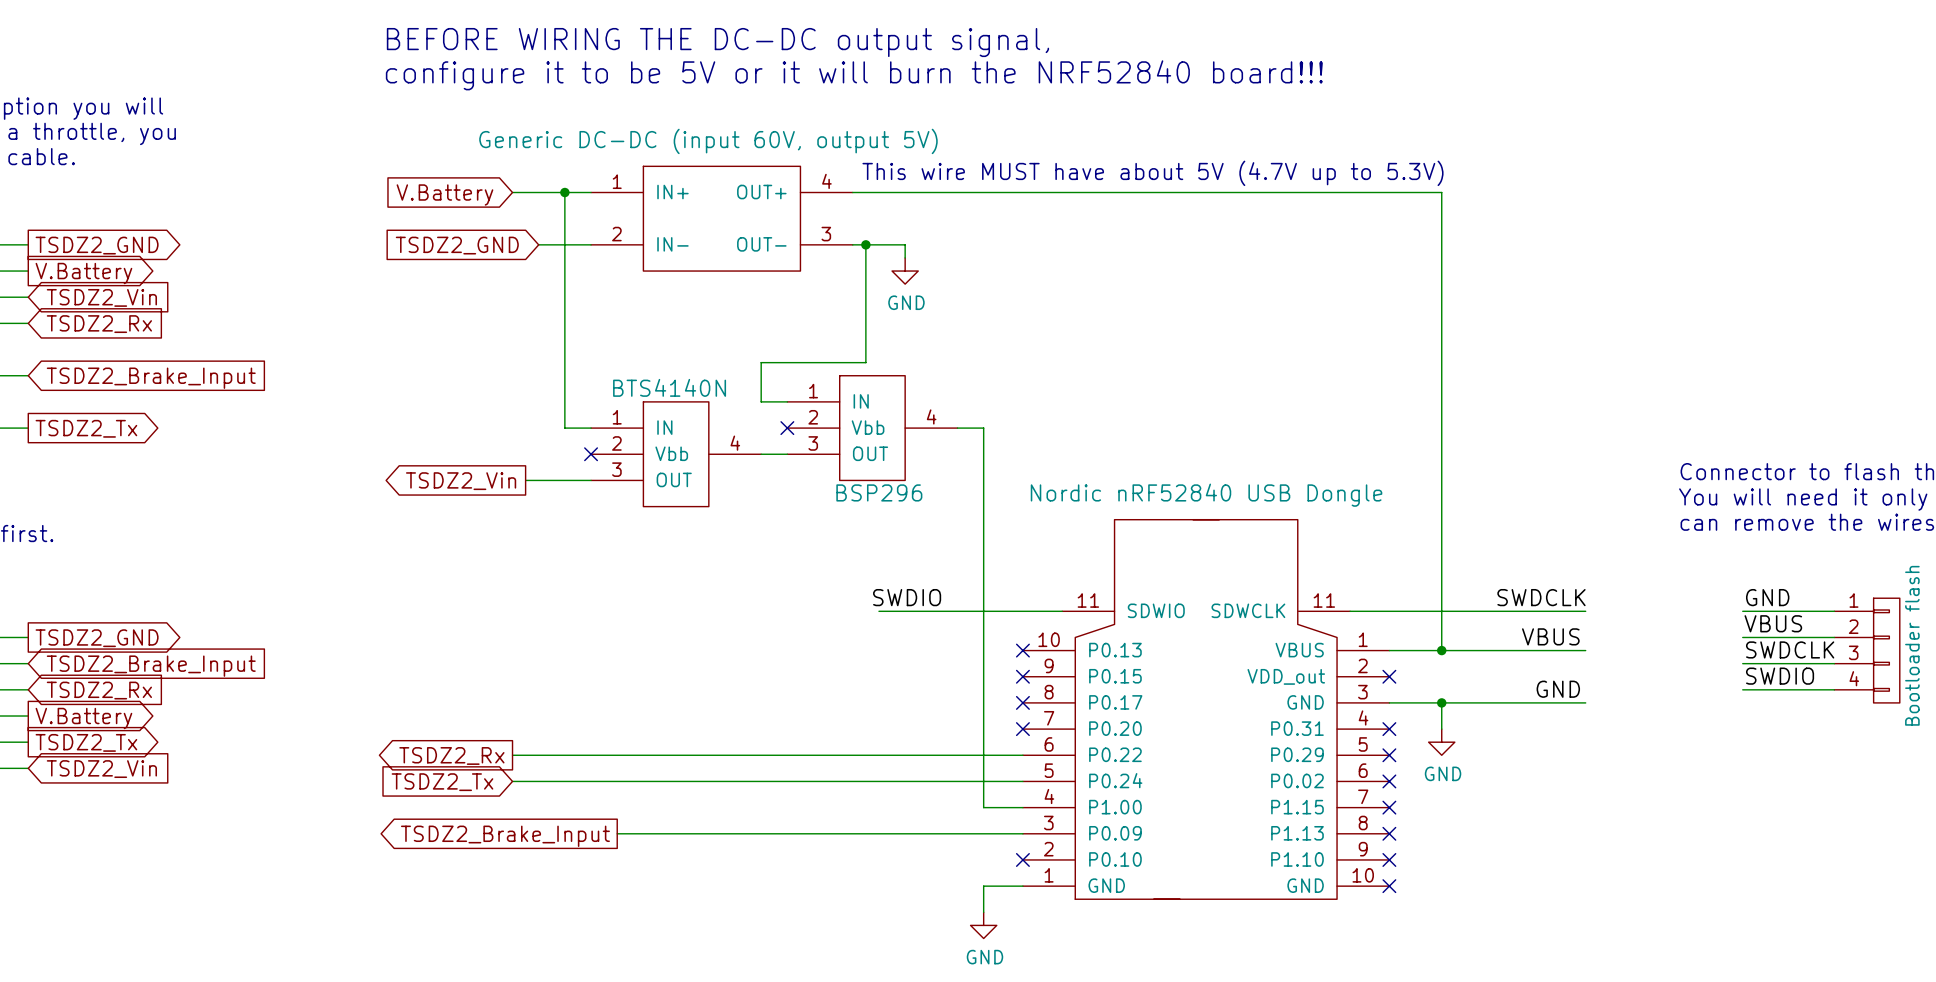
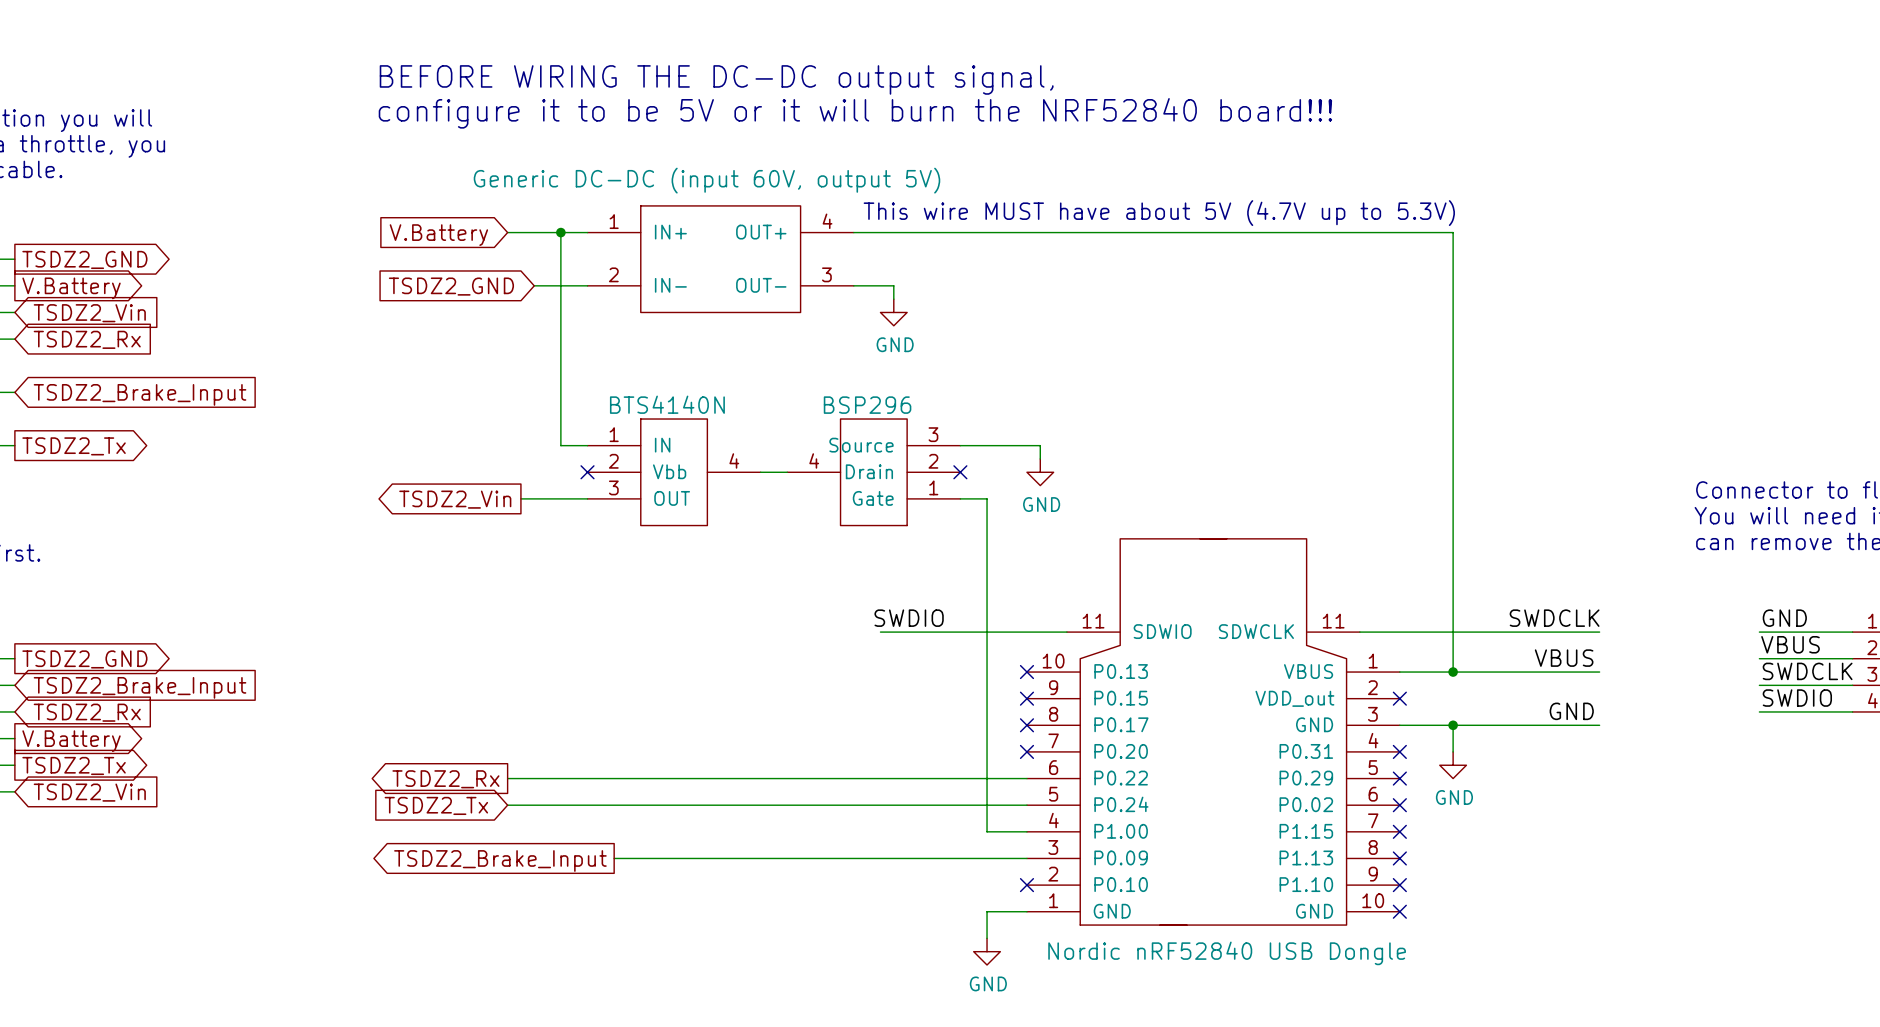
text position: BEFORE WIRING THE DC-DC output signal, (717, 42) -> BEFORE WIRING THE DC-DC output signal, (716, 79)
text position: configure it to be 5V or it will burn the NRF52840 board!!! (854, 75) -> configure it to be 5V or it will burn the NRF52840 board!!! (855, 113)
text position: This wire MUST have about 5V (4.7V up to 5.3V) (1152, 173) -> This wire MUST have about 5V (4.7V up to 5.3V) (1159, 213)
wire: (512, 192) (591, 192) -> (507, 232) (587, 232)
wire: (564, 192) (564, 218) -> none
junction position: (564, 192) -> (560, 232)
wire: (852, 192) (1441, 192) (1441, 218) -> (853, 232) (1453, 232)
global label position: V.Battery (444, 194) -> V.Battery (438, 235)
part position: (721, 218) -> (720, 259)
wire: (538, 244) (591, 244) -> (534, 285) (587, 285)
wire: (852, 244) (905, 244) (905, 257) -> (987, 445) (1040, 445) (1040, 458)
wire: (865, 244) (865, 362) (761, 362) (761, 401) (787, 401) -> none
junction: (865, 244) -> none
global label position: TSDZ2_GND (457, 245) -> TSDZ2_GND (451, 286)
wire: none -> (853, 285) (893, 285) (893, 299)
power symbol position: GND (905, 271) -> GND (893, 312)
no-connect mark: (787, 428) -> none
part: BSP296 (872, 428) -> none
wire: (983, 428) (983, 480) -> (960, 498) (987, 498)
part: none -> BSP296 (873, 472)
no-connect mark: none -> (960, 472)
power symbol: none -> GND (1040, 472)
part value position: Nordic nRF52840 USB Dongle (1206, 495) -> Nordic nRF52840 USB Dongle (1227, 953)

